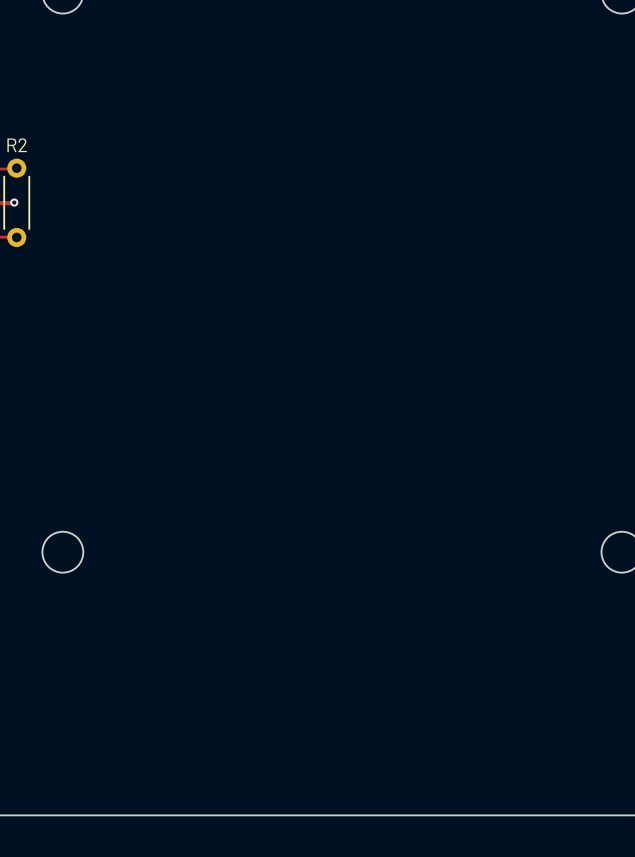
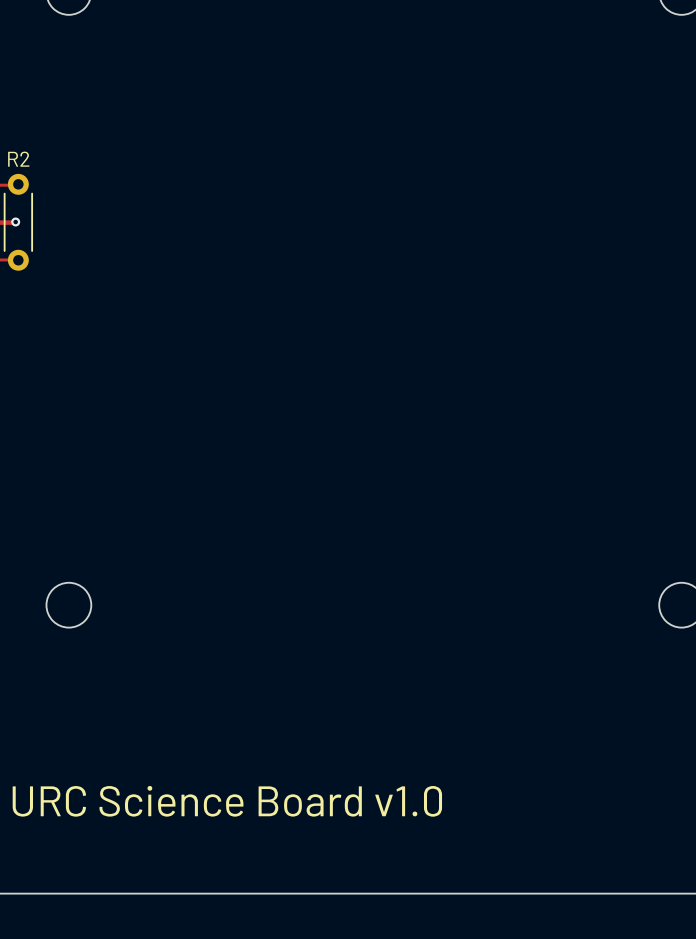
text: none -> URC Science Board v1.0 (227, 801)

